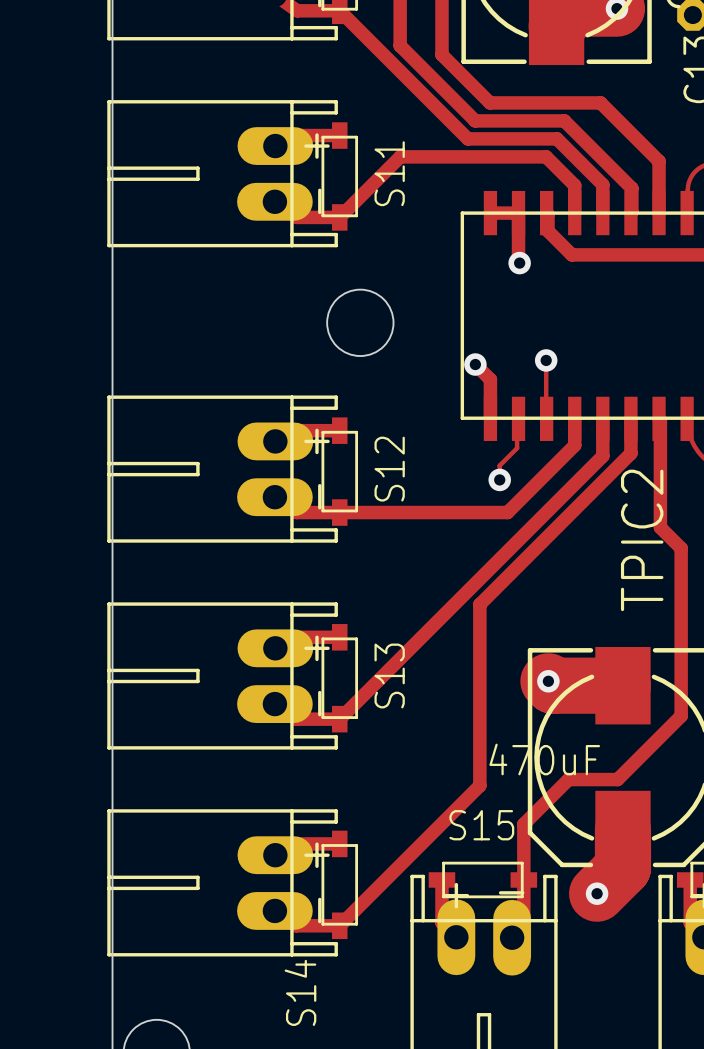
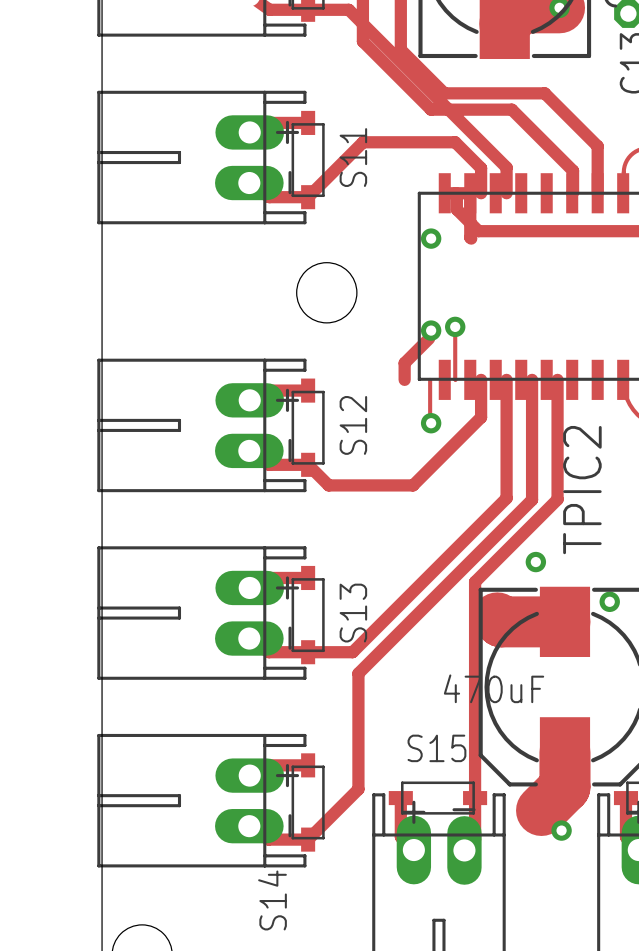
track: (339, 10) (467, 138) (556, 138) (602, 184) (602, 213) -> (308, 9) (348, 9) (506, 167) (506, 193)
track: (501, 156) (546, 156) (574, 185) (574, 213) -> (455, 142) (481, 168) (481, 193)
track: (546, 213) (548, 231) (571, 254) -> (455, 193) (456, 209) (478, 231) (518, 231)
via position: (519, 263) -> (431, 238)
track: (546, 360) (546, 418) -> (455, 326) (455, 379)
via position: (546, 360) -> (455, 326)
track: (475, 364) (490, 379) (490, 418) -> none
track: none -> (429, 338) (404, 363) (404, 379)
track: none -> (430, 379) (431, 423)
track: (518, 418) (517, 448) (499, 465) (499, 479) -> none
track: (574, 418) (574, 445) (507, 512) (339, 512) -> (481, 379) (481, 417) (413, 485) (328, 485) (308, 464)
track: (602, 418) (602, 456) (339, 719) -> (506, 379) (506, 498) (352, 652) (308, 652)
track: (630, 418) (630, 453) (479, 604) (479, 785) (395, 870) -> (532, 379) (532, 499) (358, 673) (358, 789)
track: (659, 418) (660, 527) (681, 548) (681, 716) (617, 779) (568, 779) (523, 824) -> (557, 379) (557, 499) (475, 581) (475, 747)
via position: (499, 479) -> (431, 423)
via: none -> (535, 562)
via: none -> (609, 601)
via: (548, 681) -> none
via position: (597, 893) -> (561, 830)

